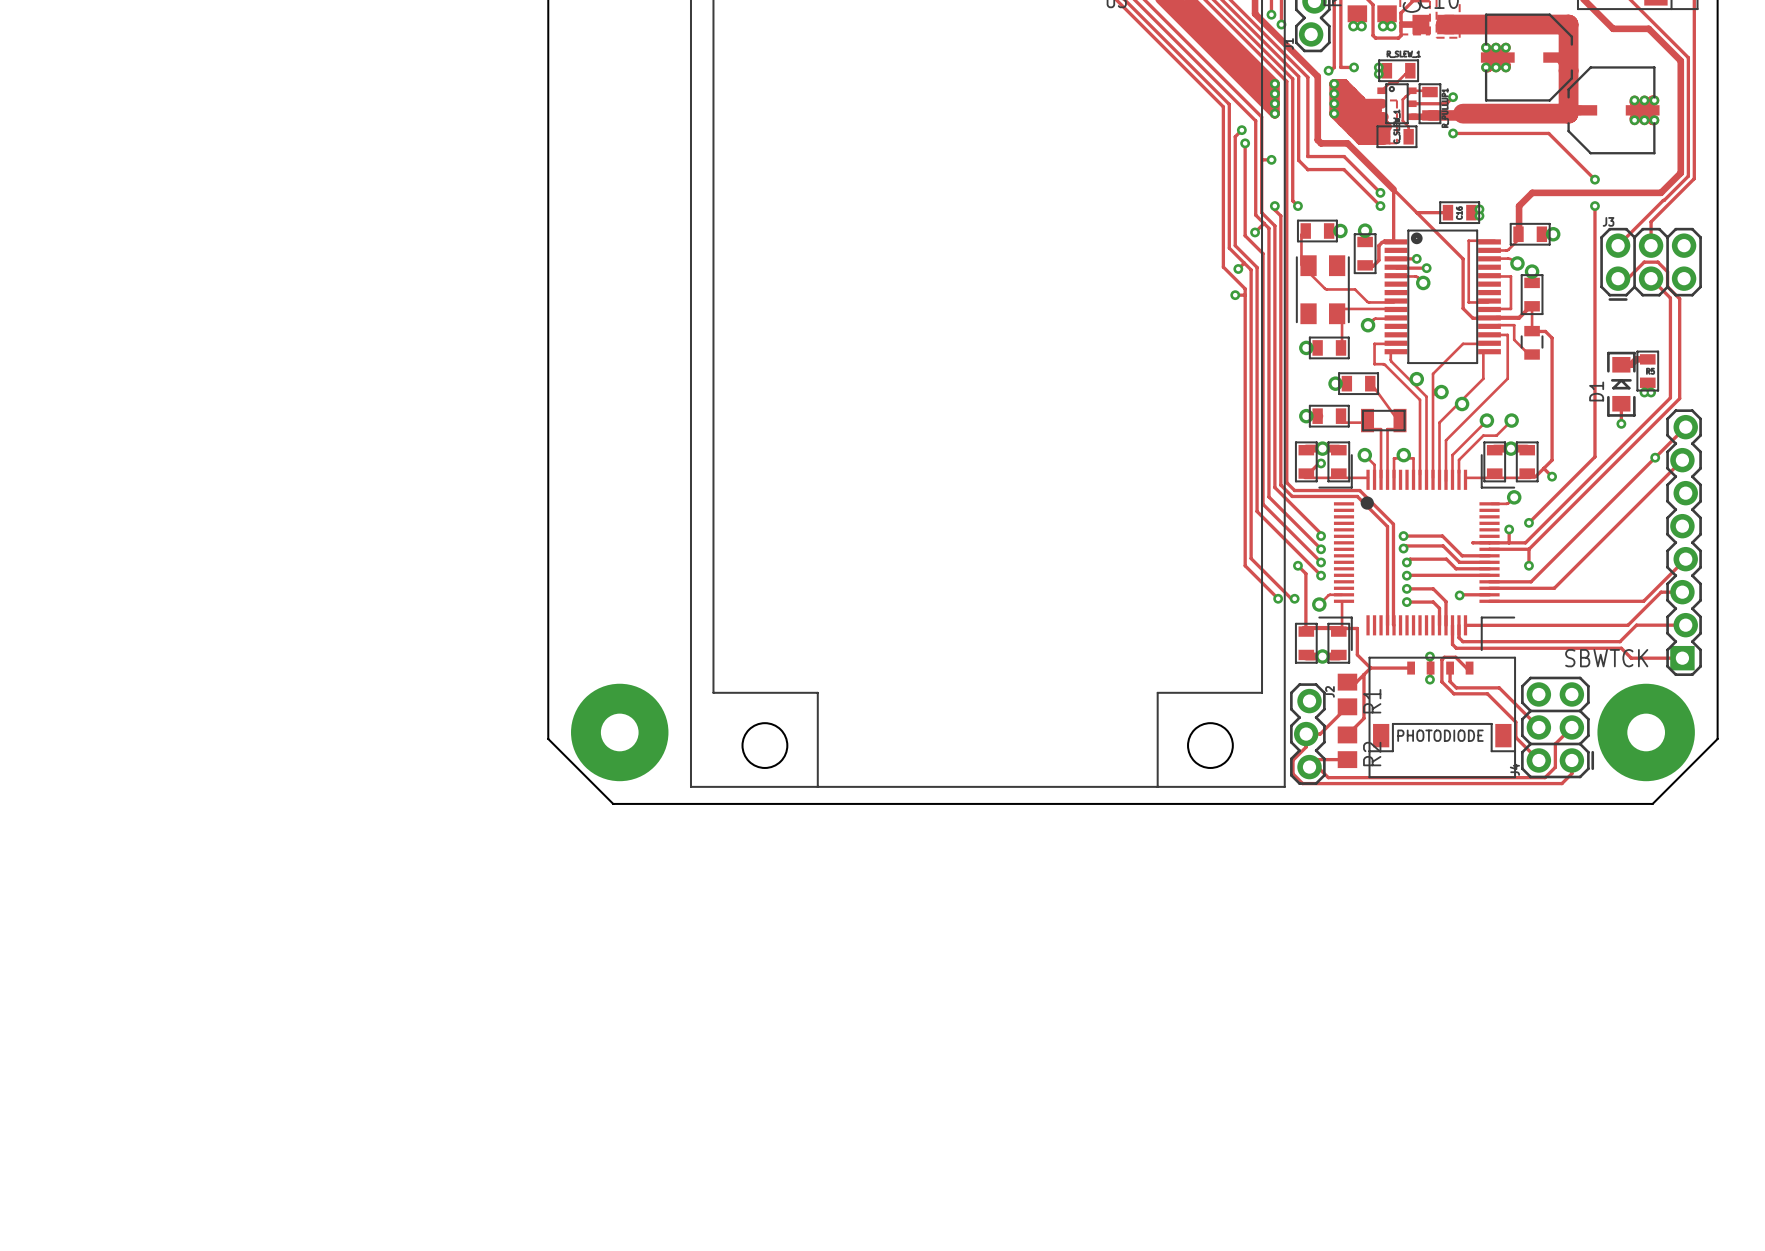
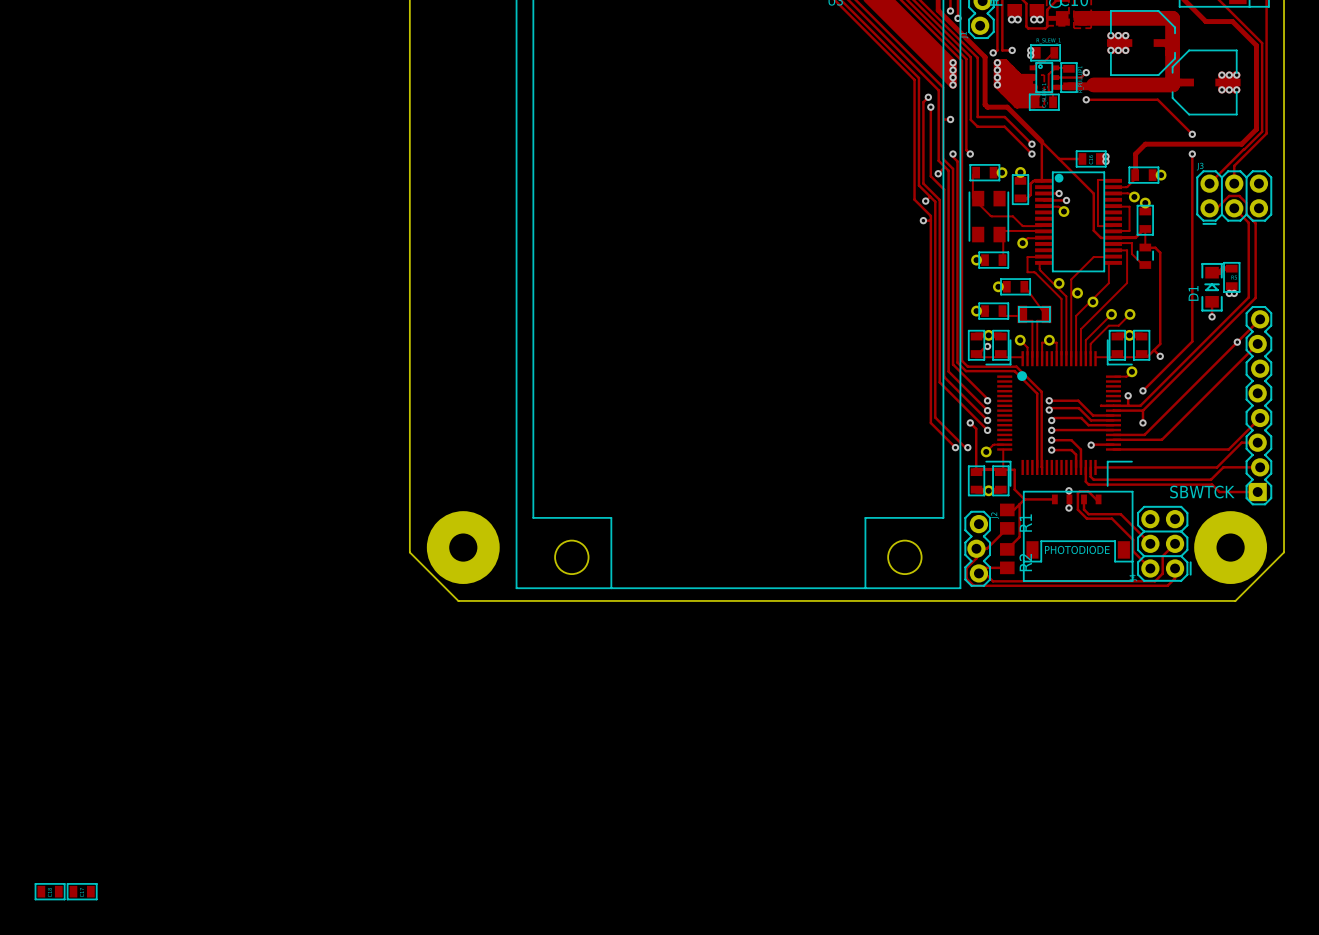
part: none -> (50, 891)
part: none -> (82, 891)

